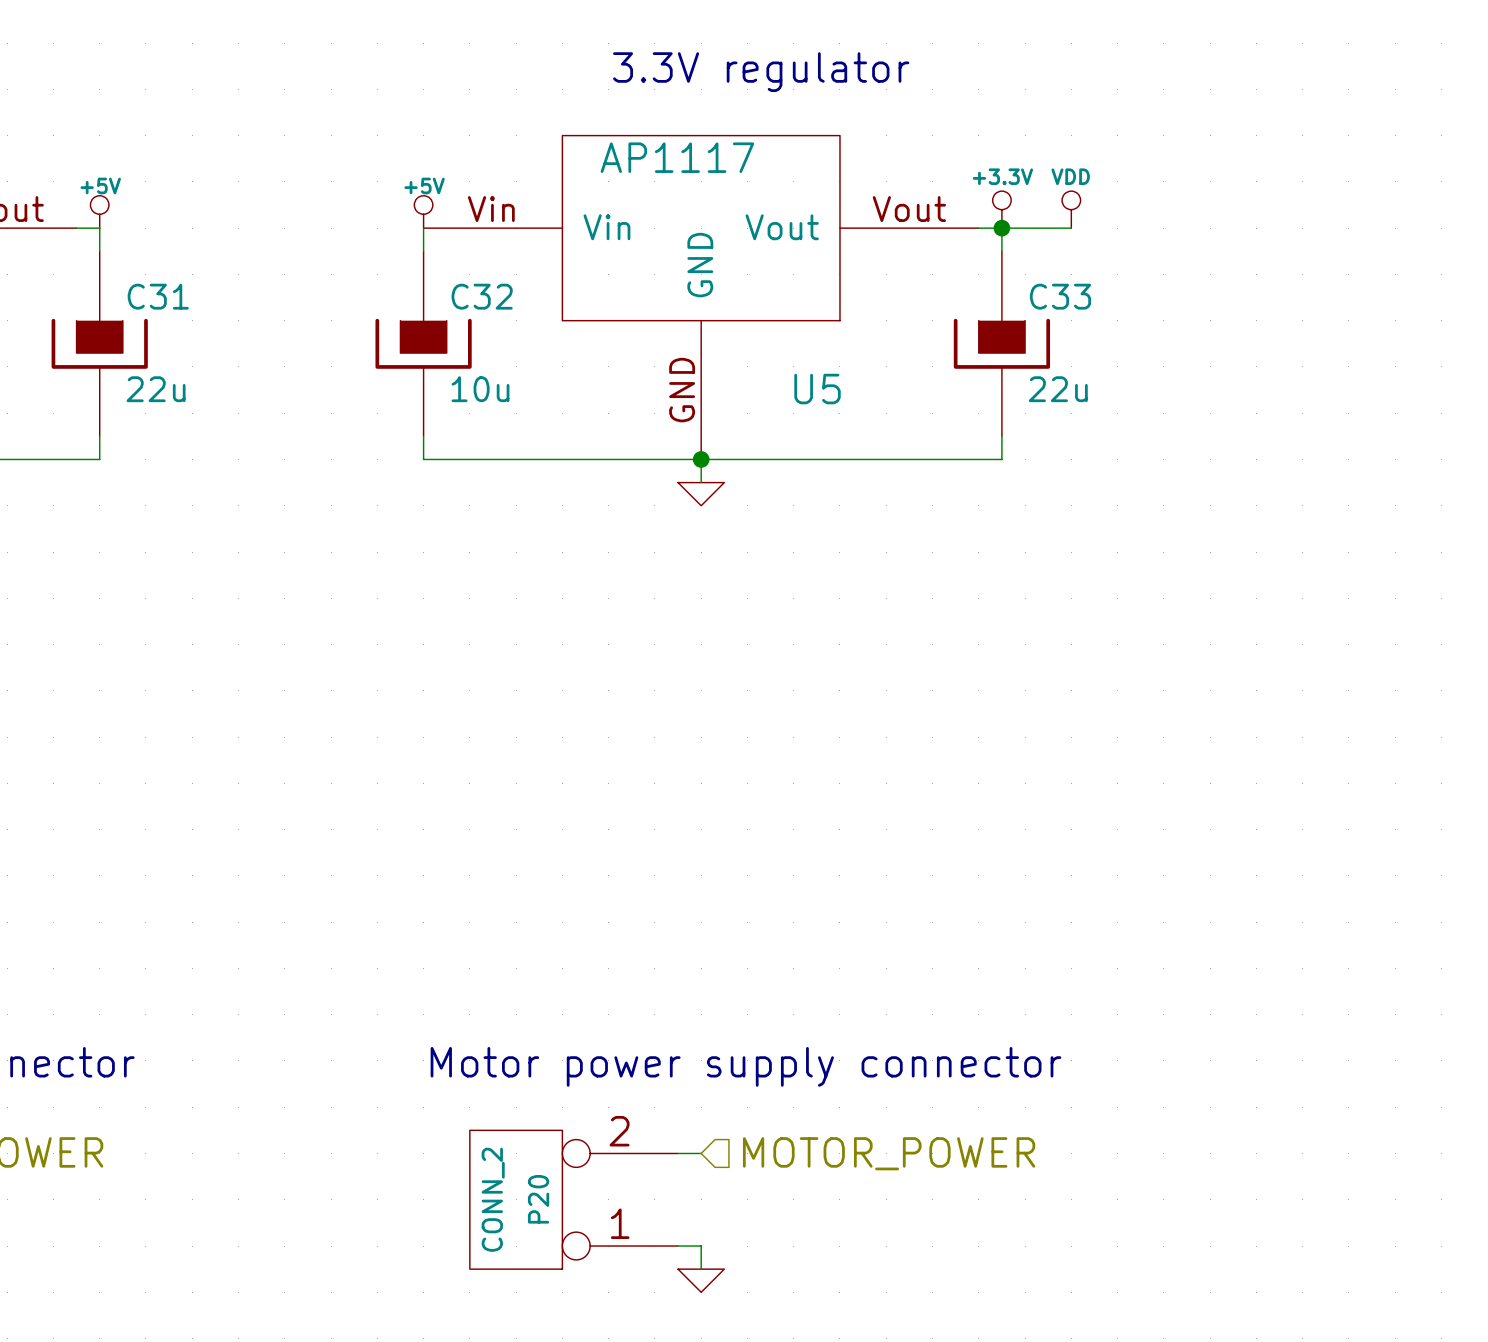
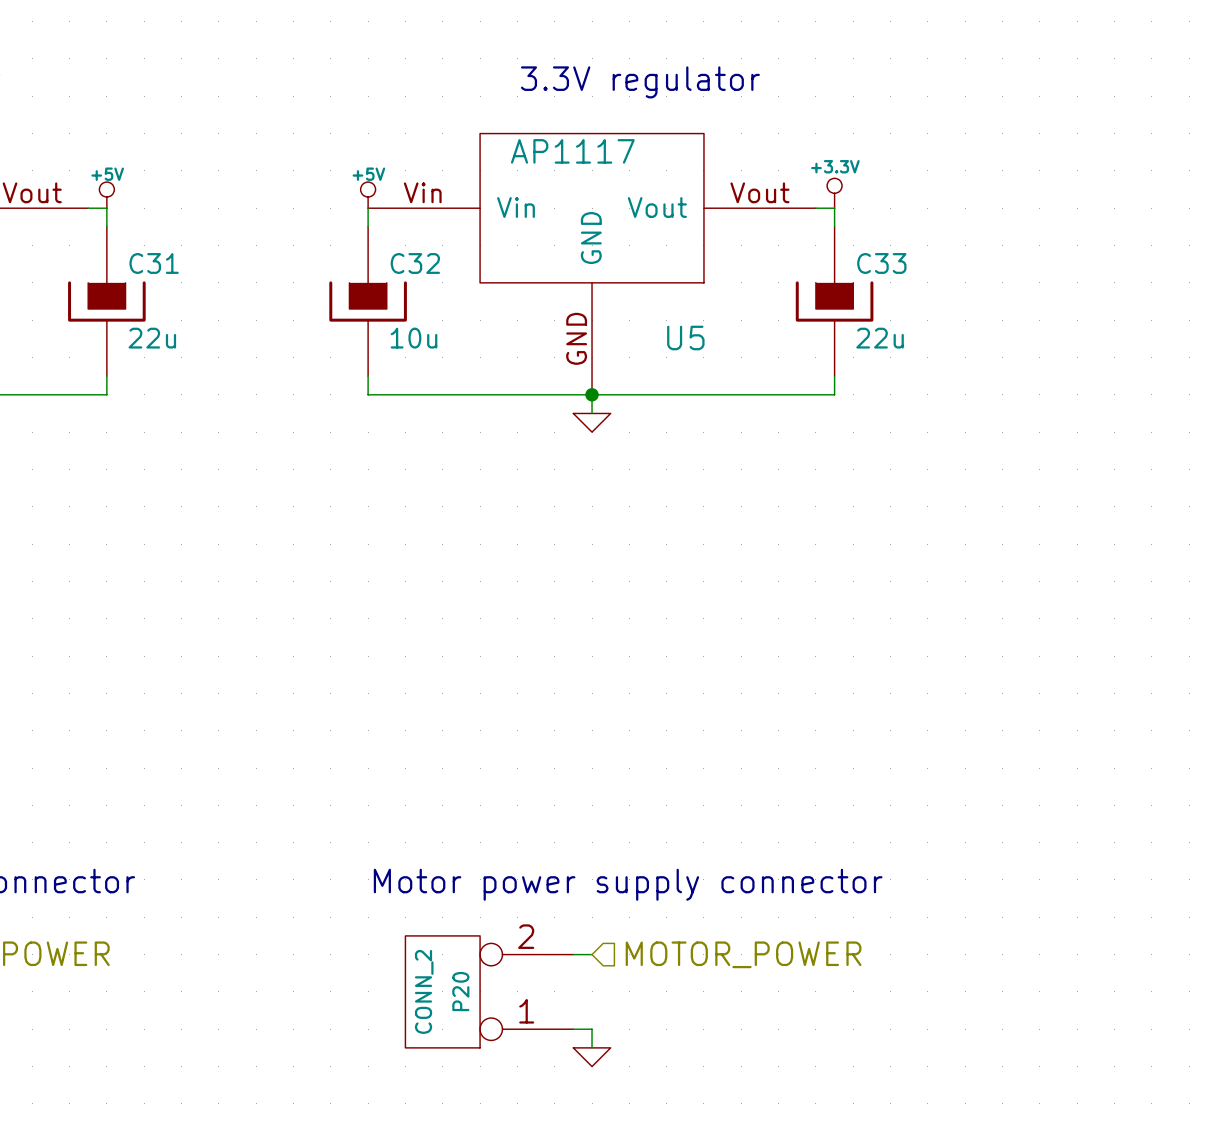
power symbol: VDD (1071, 209) -> none
wire: (1001, 228) (1071, 228) -> none
junction: (1001, 228) -> none

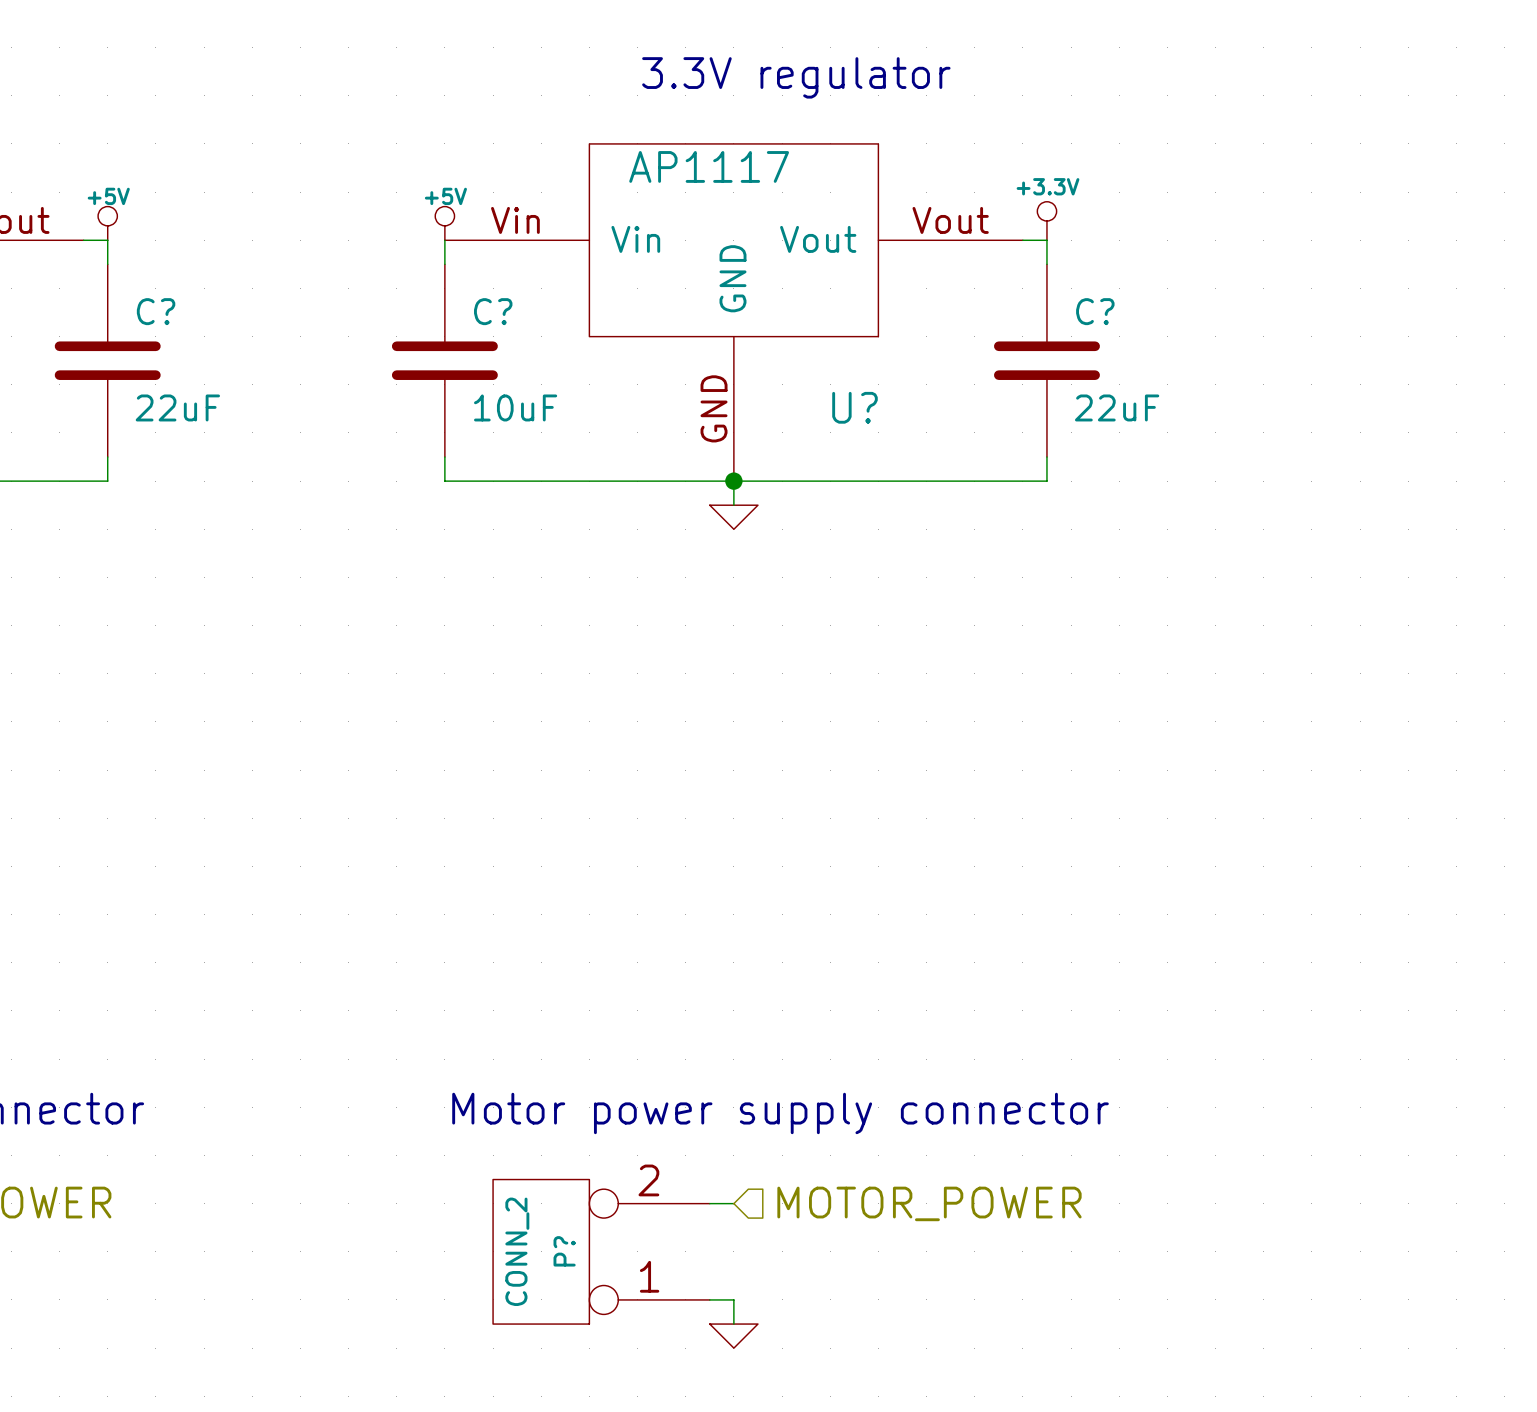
C31: 22u (106, 301) -> none
C?: none -> 22uF (107, 360)
C32: 10u (368, 301) -> none
C?: none -> 10uF (444, 360)
C33: 22u (834, 301) -> none
C?: none -> 22uF (1046, 360)
U5 name: U5 (685, 337) -> U? (854, 407)
P20 name: P20 (460, 991) -> P? (564, 1251)

